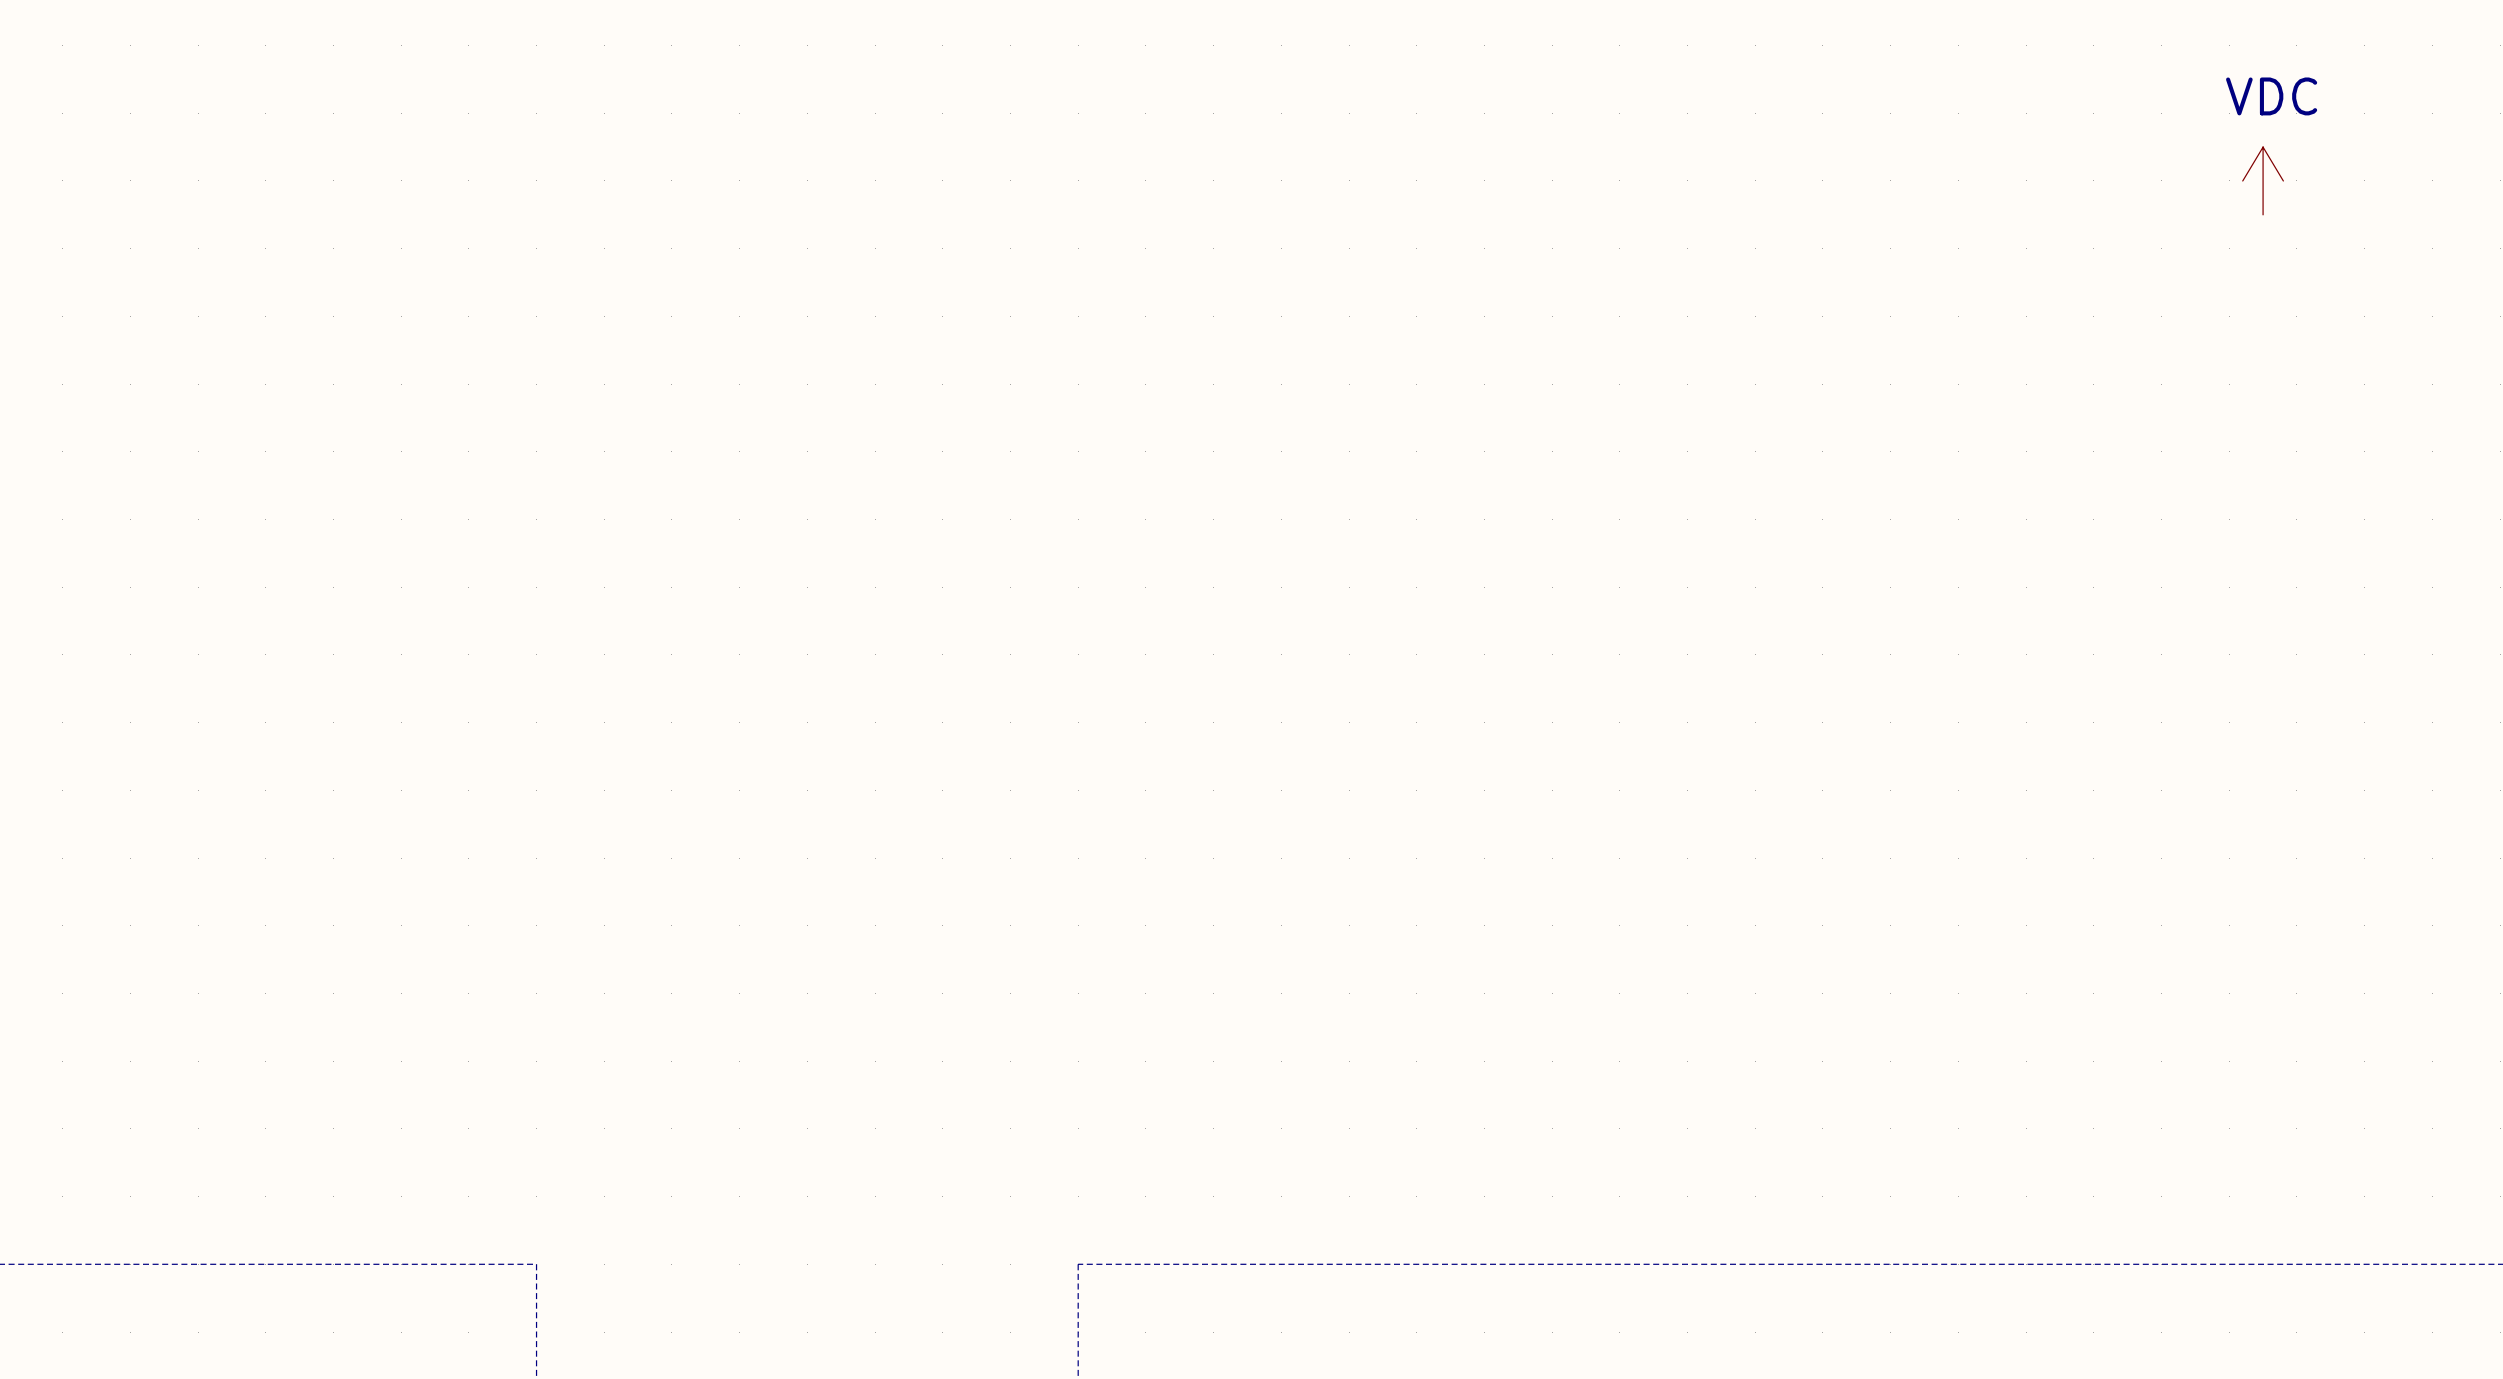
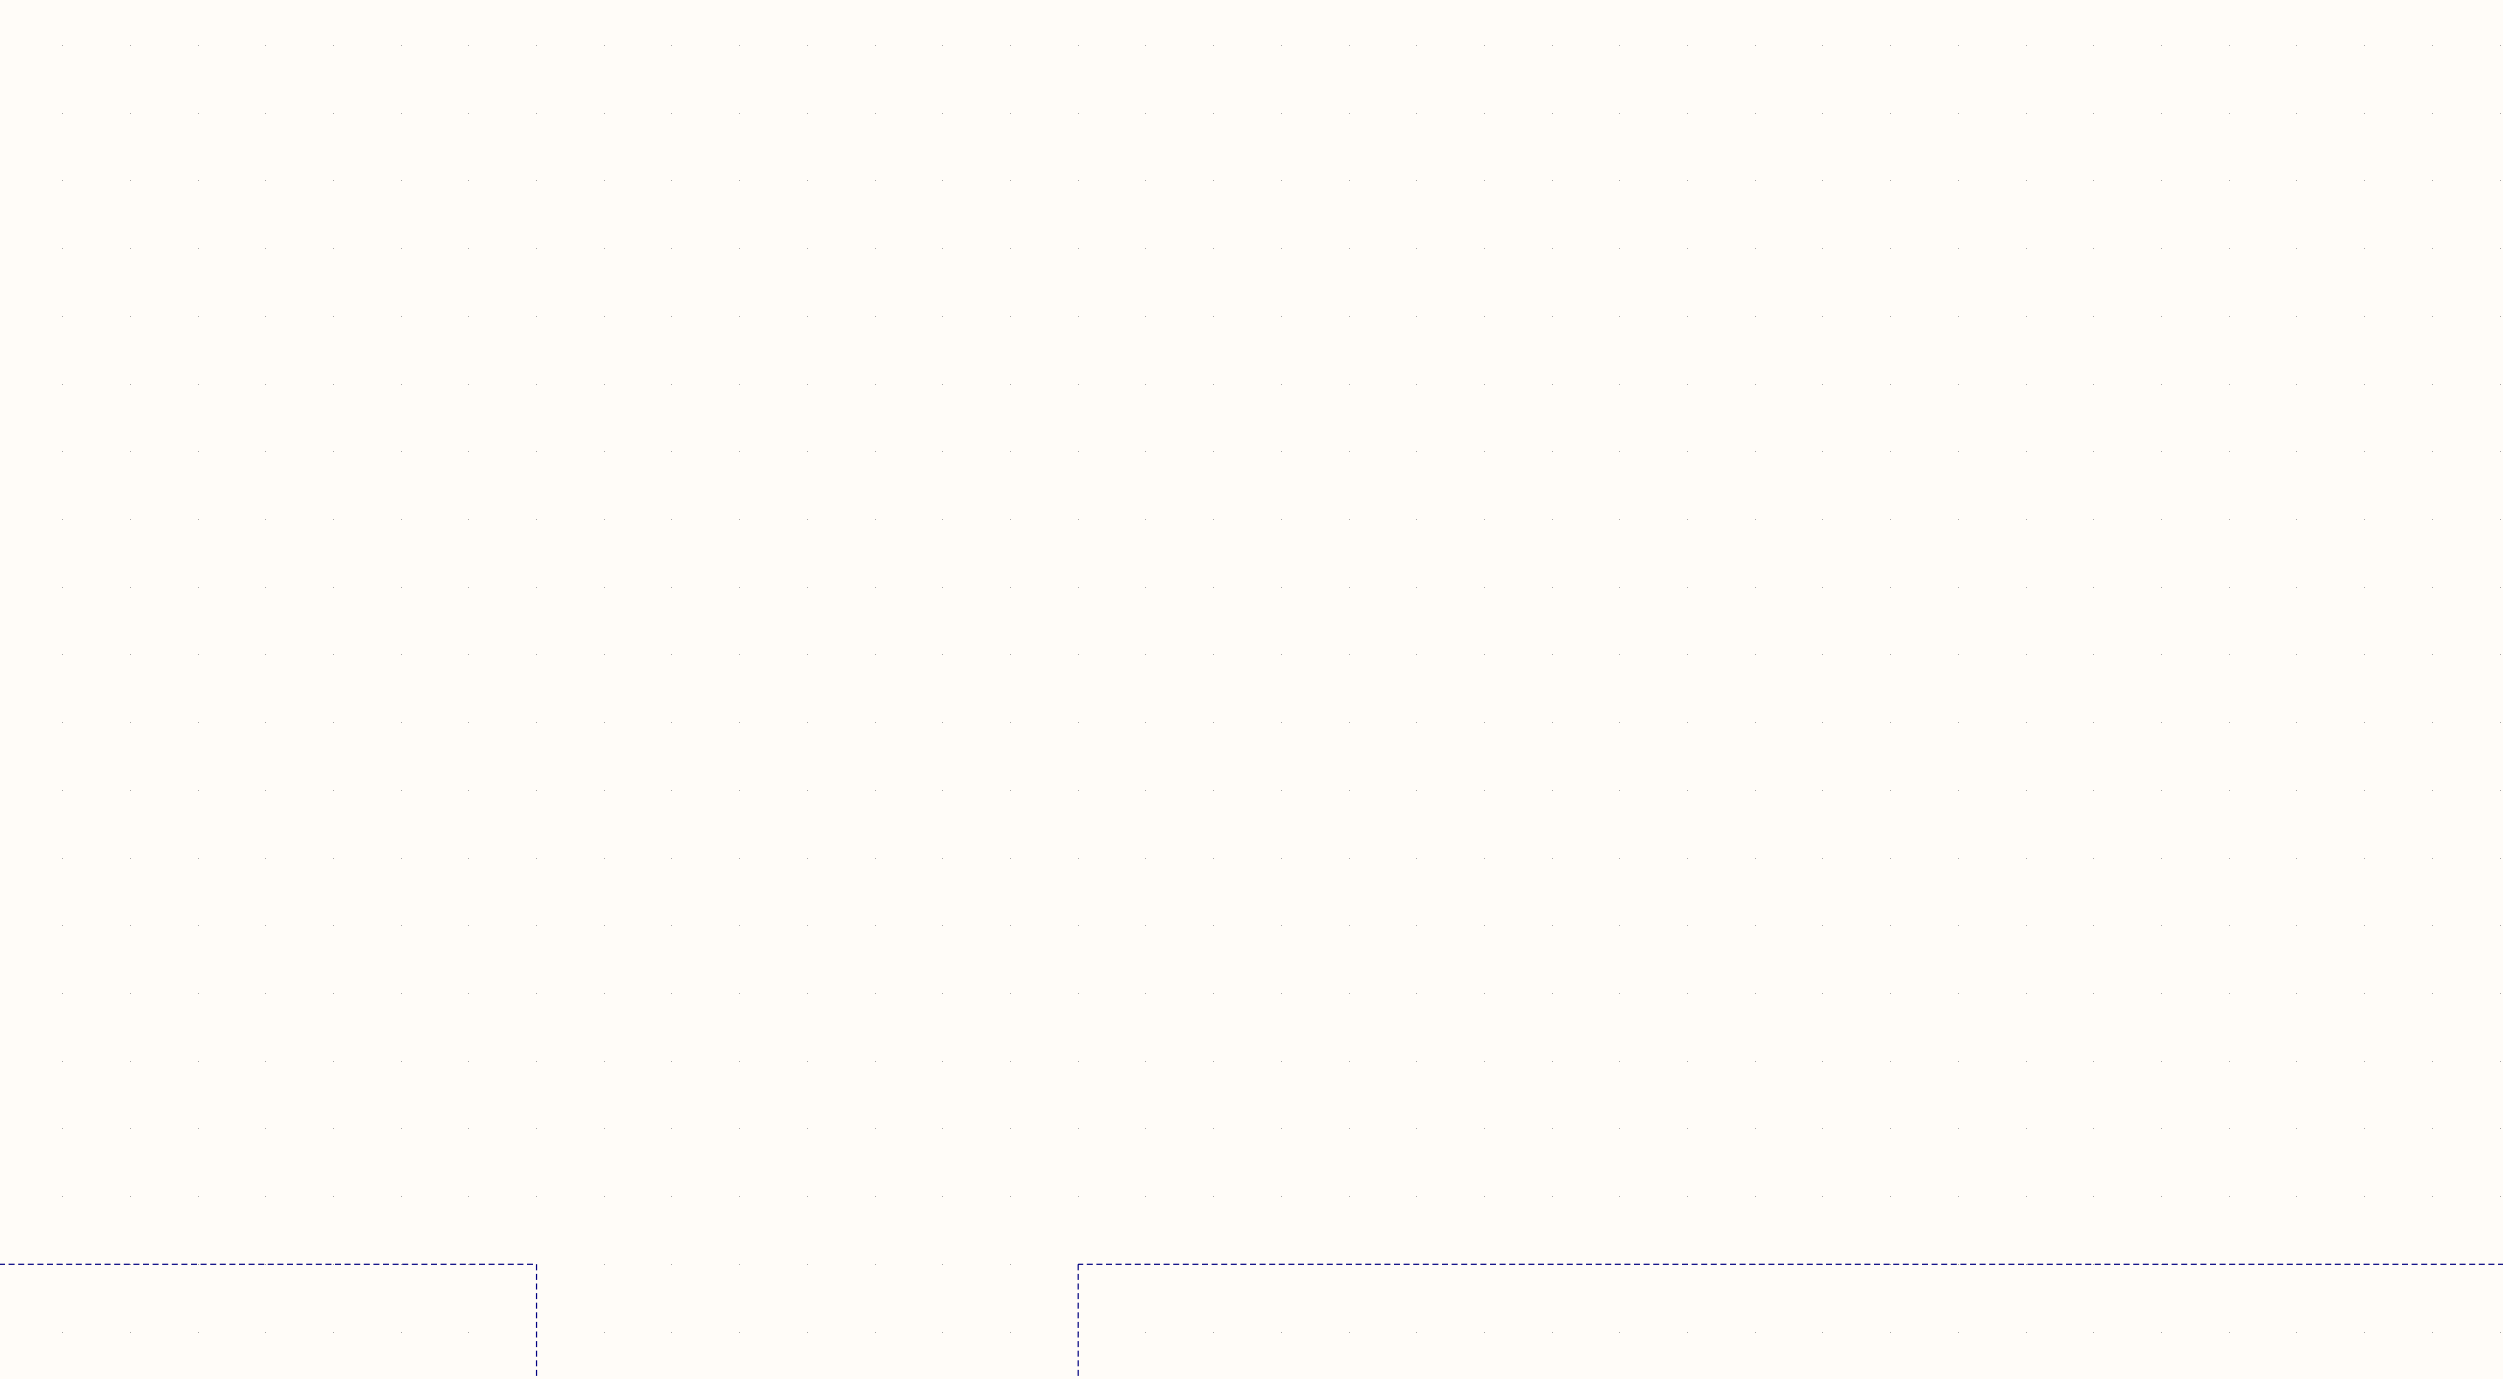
power symbol: VDC (2263, 180) -> none

